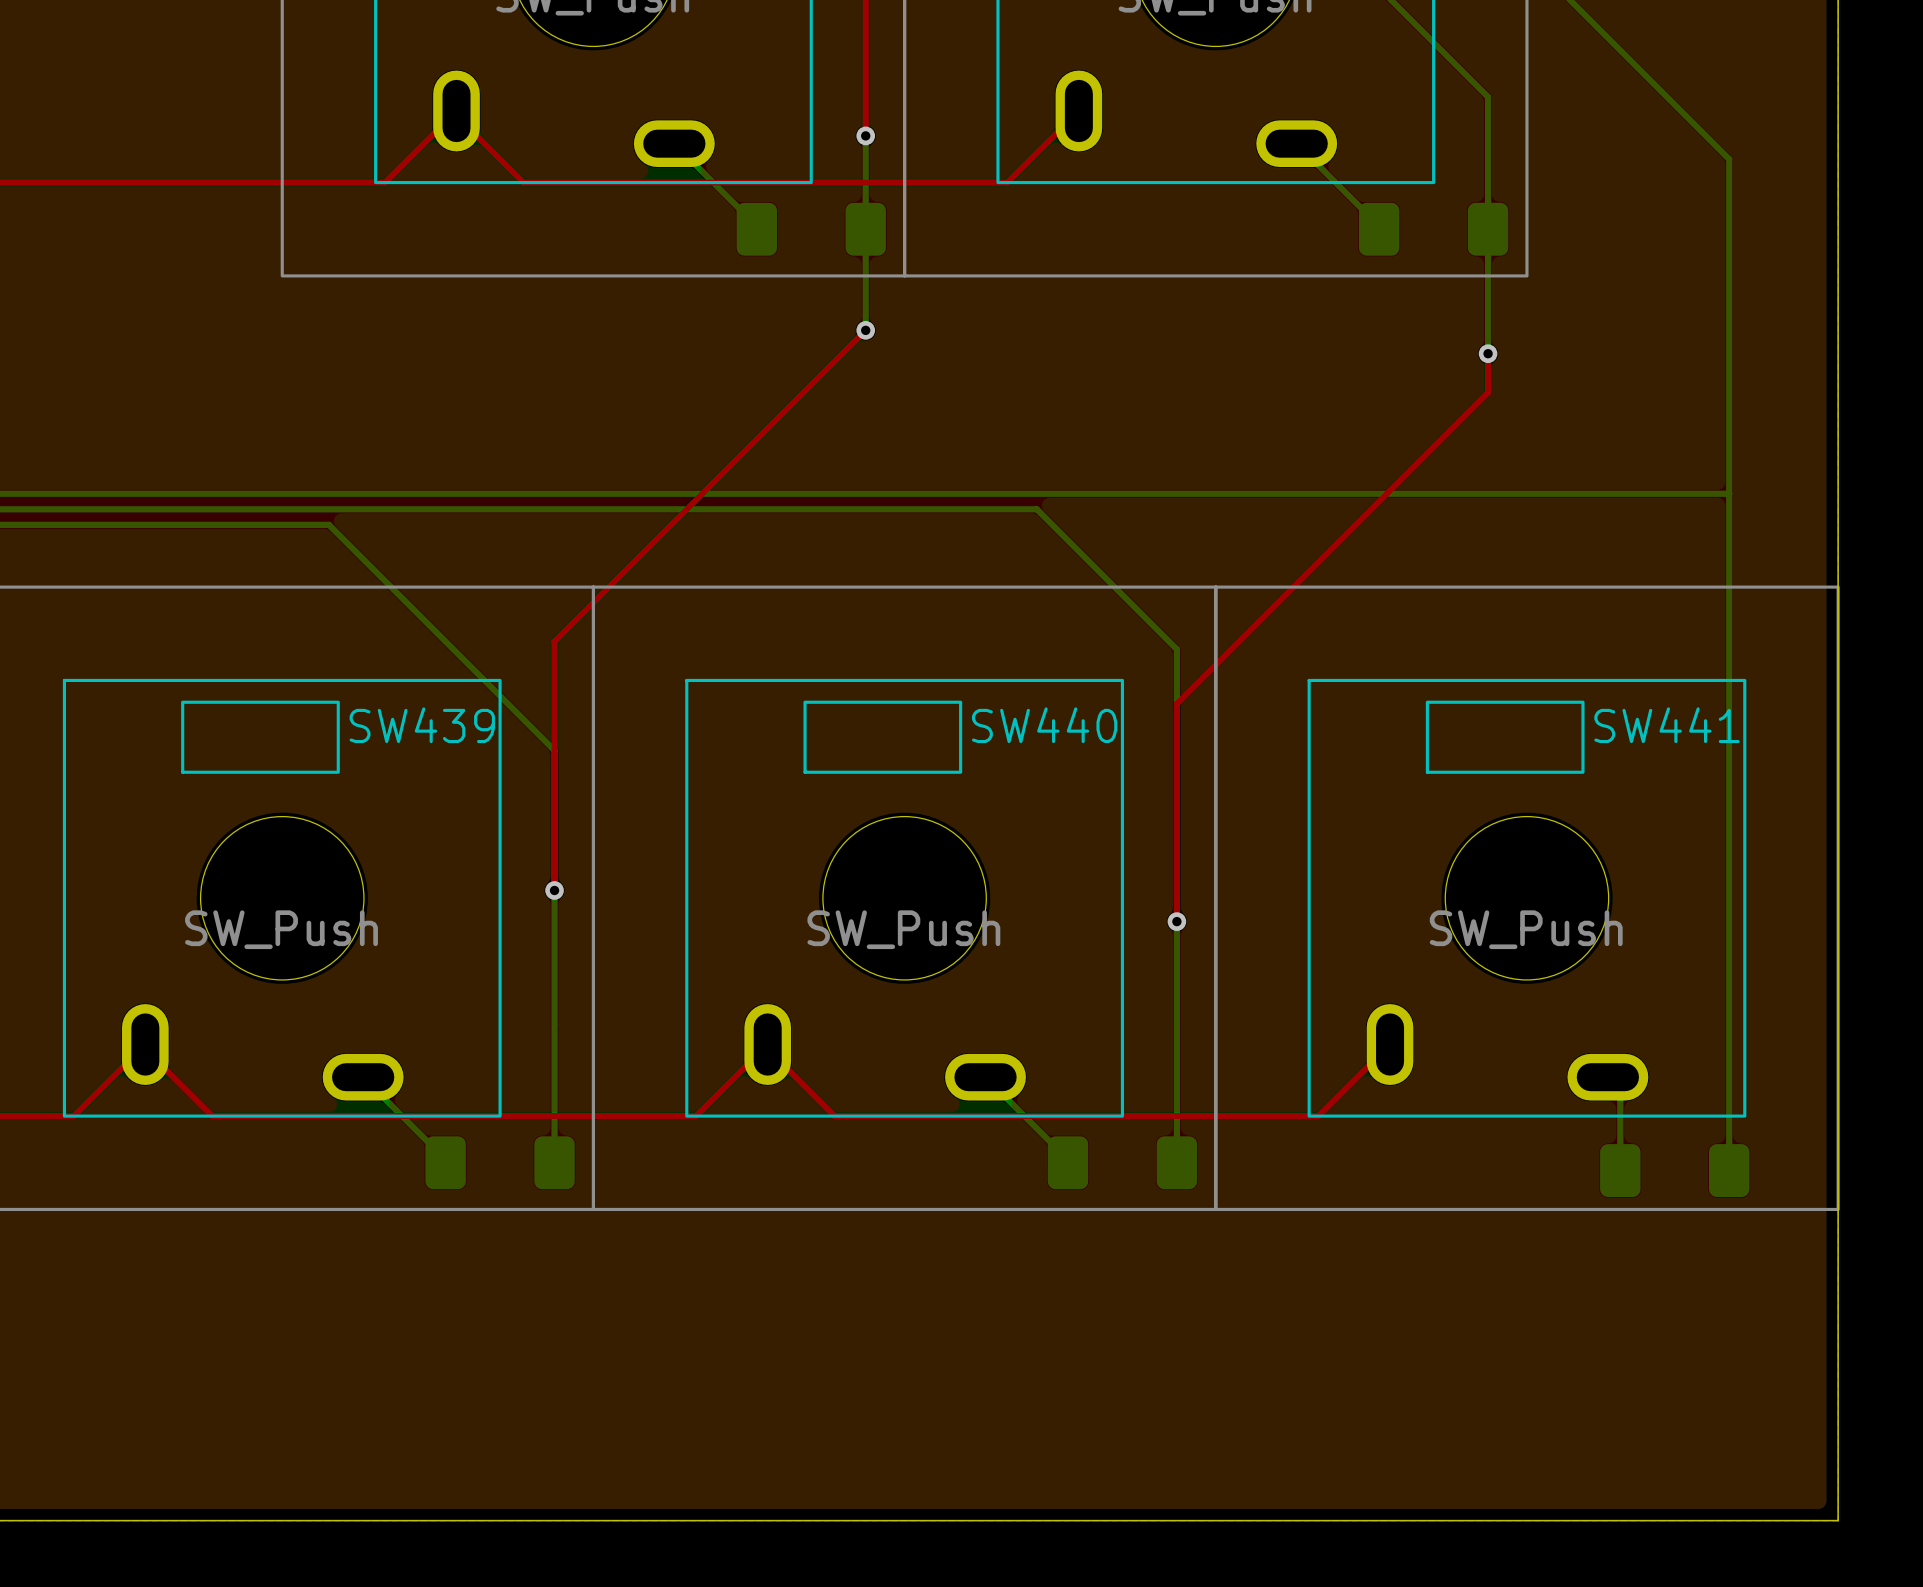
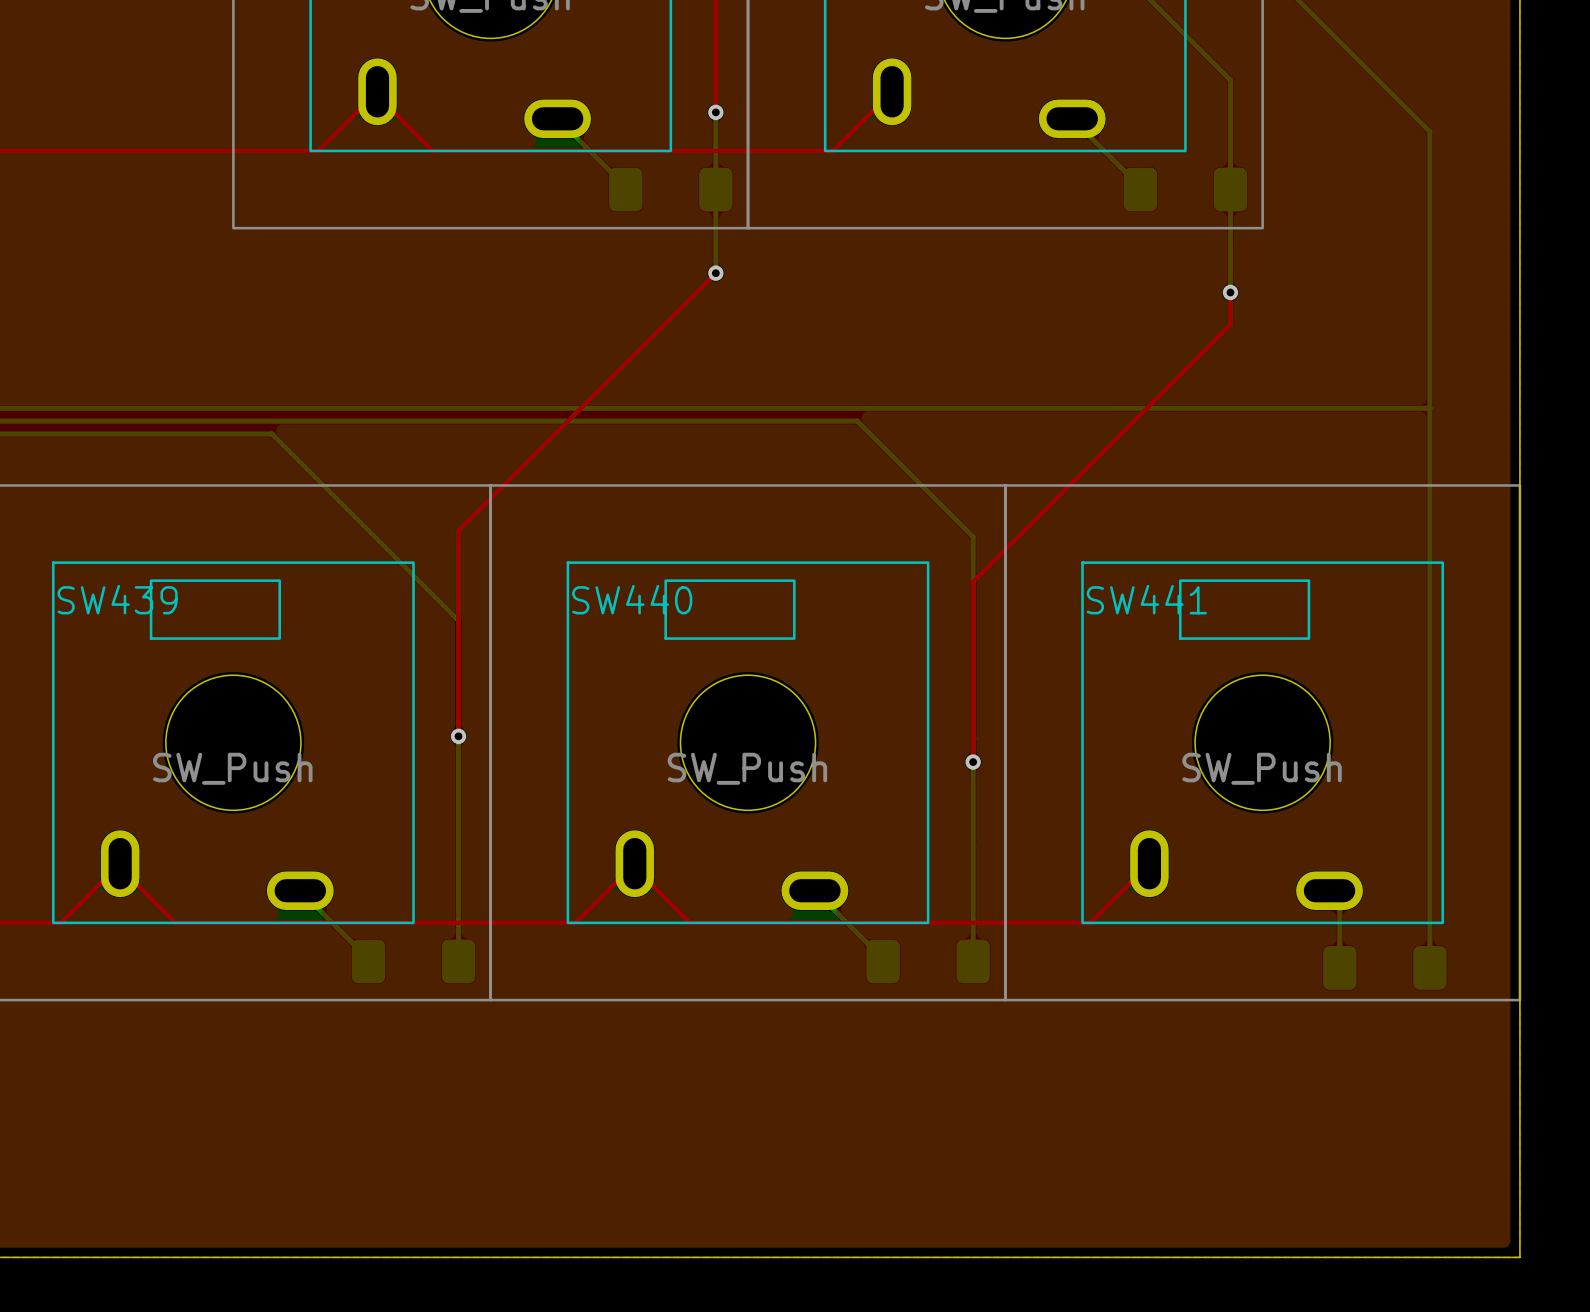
SW439 name position: SW439 (422, 725) -> SW439 (117, 599)
SW440 name position: SW440 (1044, 725) -> SW440 (632, 599)
SW441 name position: SW441 (1667, 725) -> SW441 (1146, 599)

